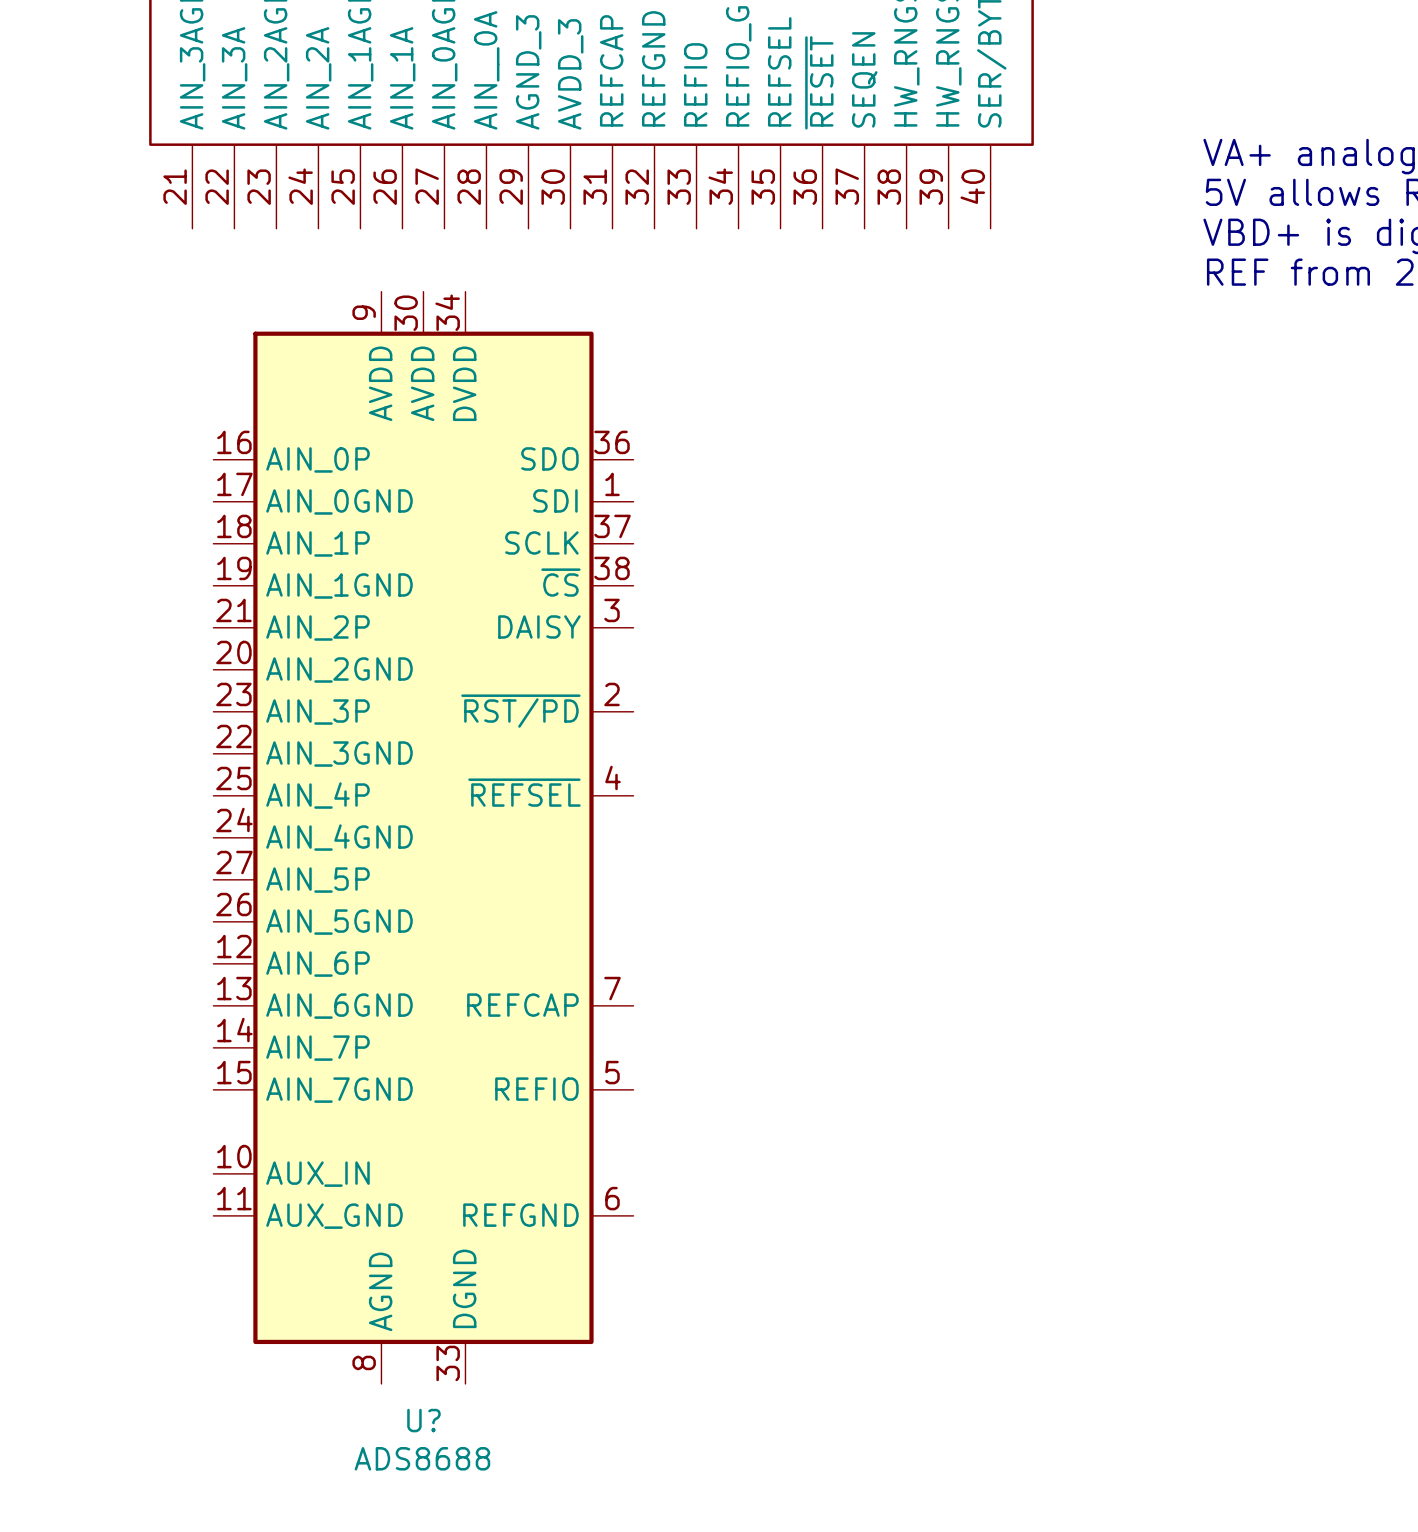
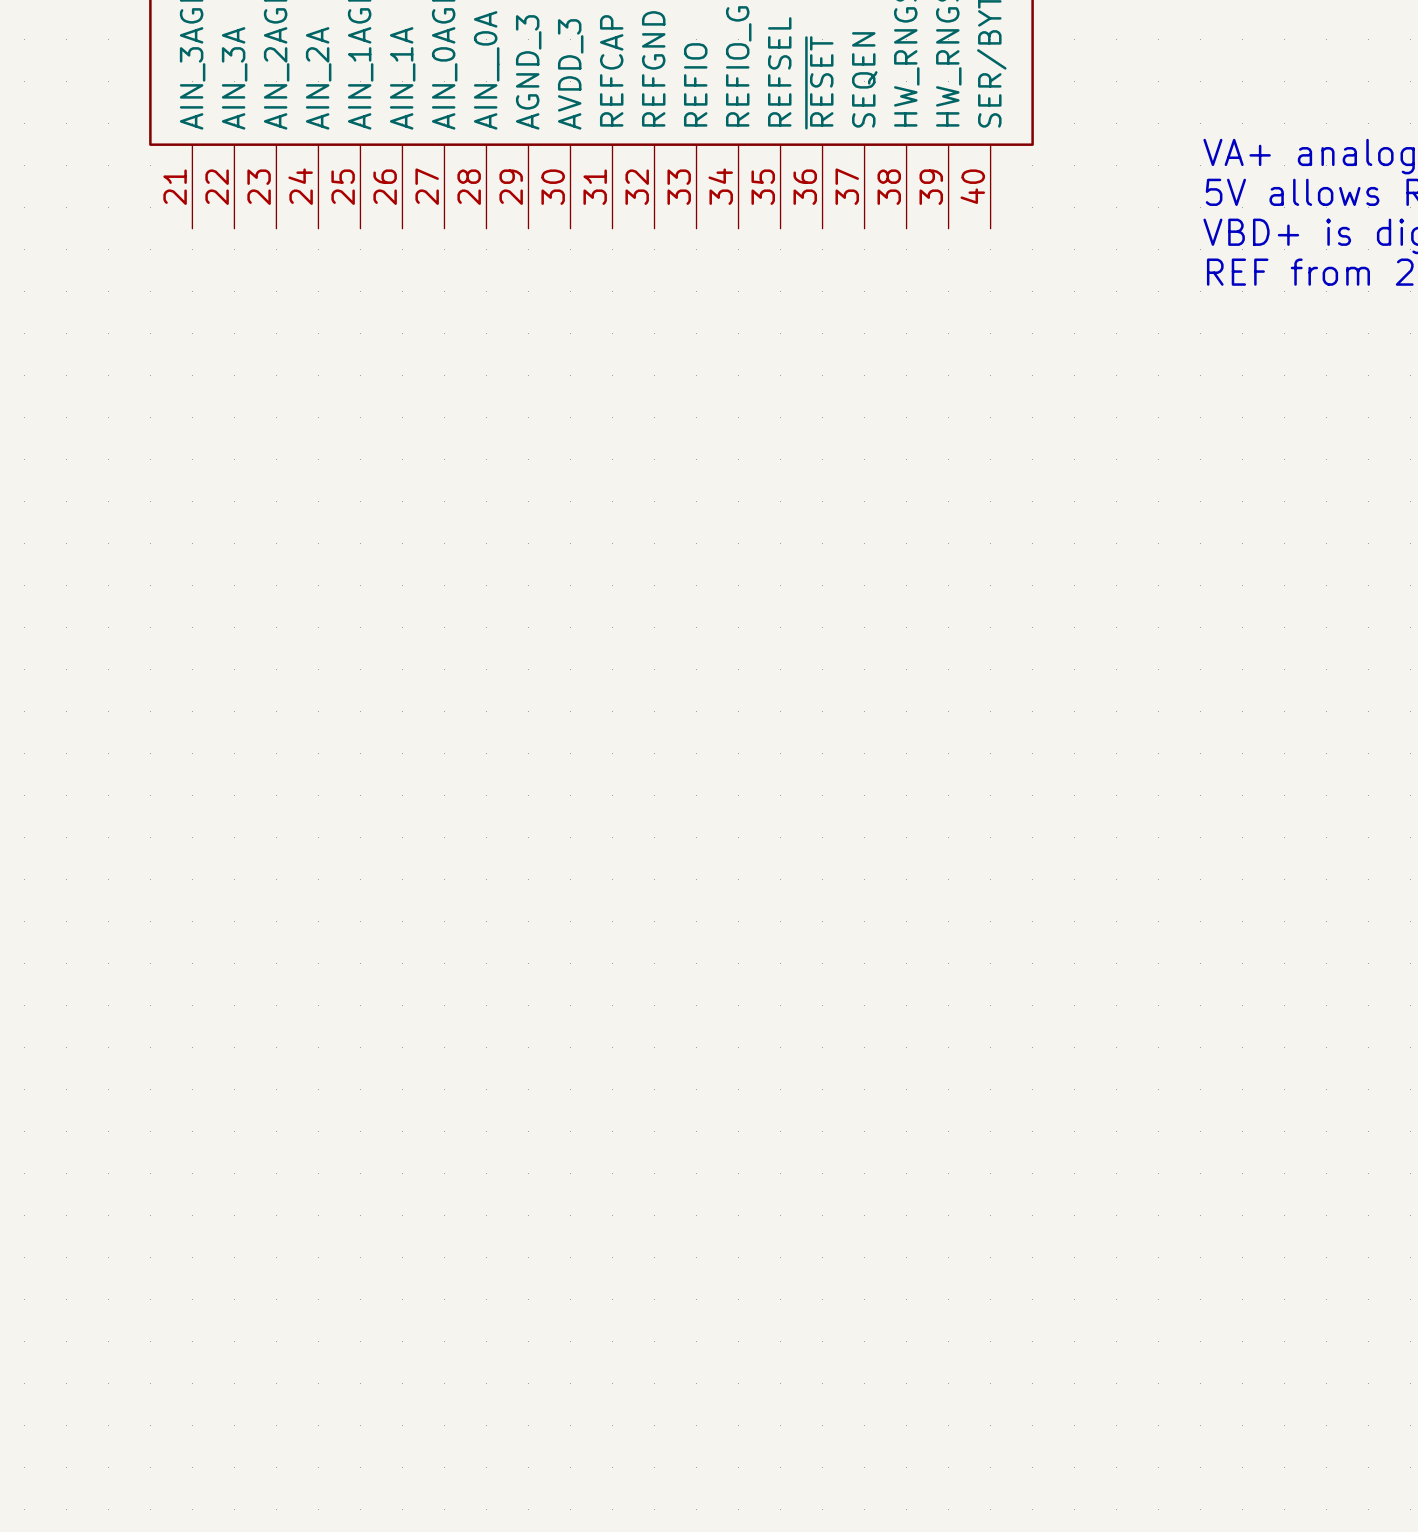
U?: ADS8688 (423, 837) -> none

